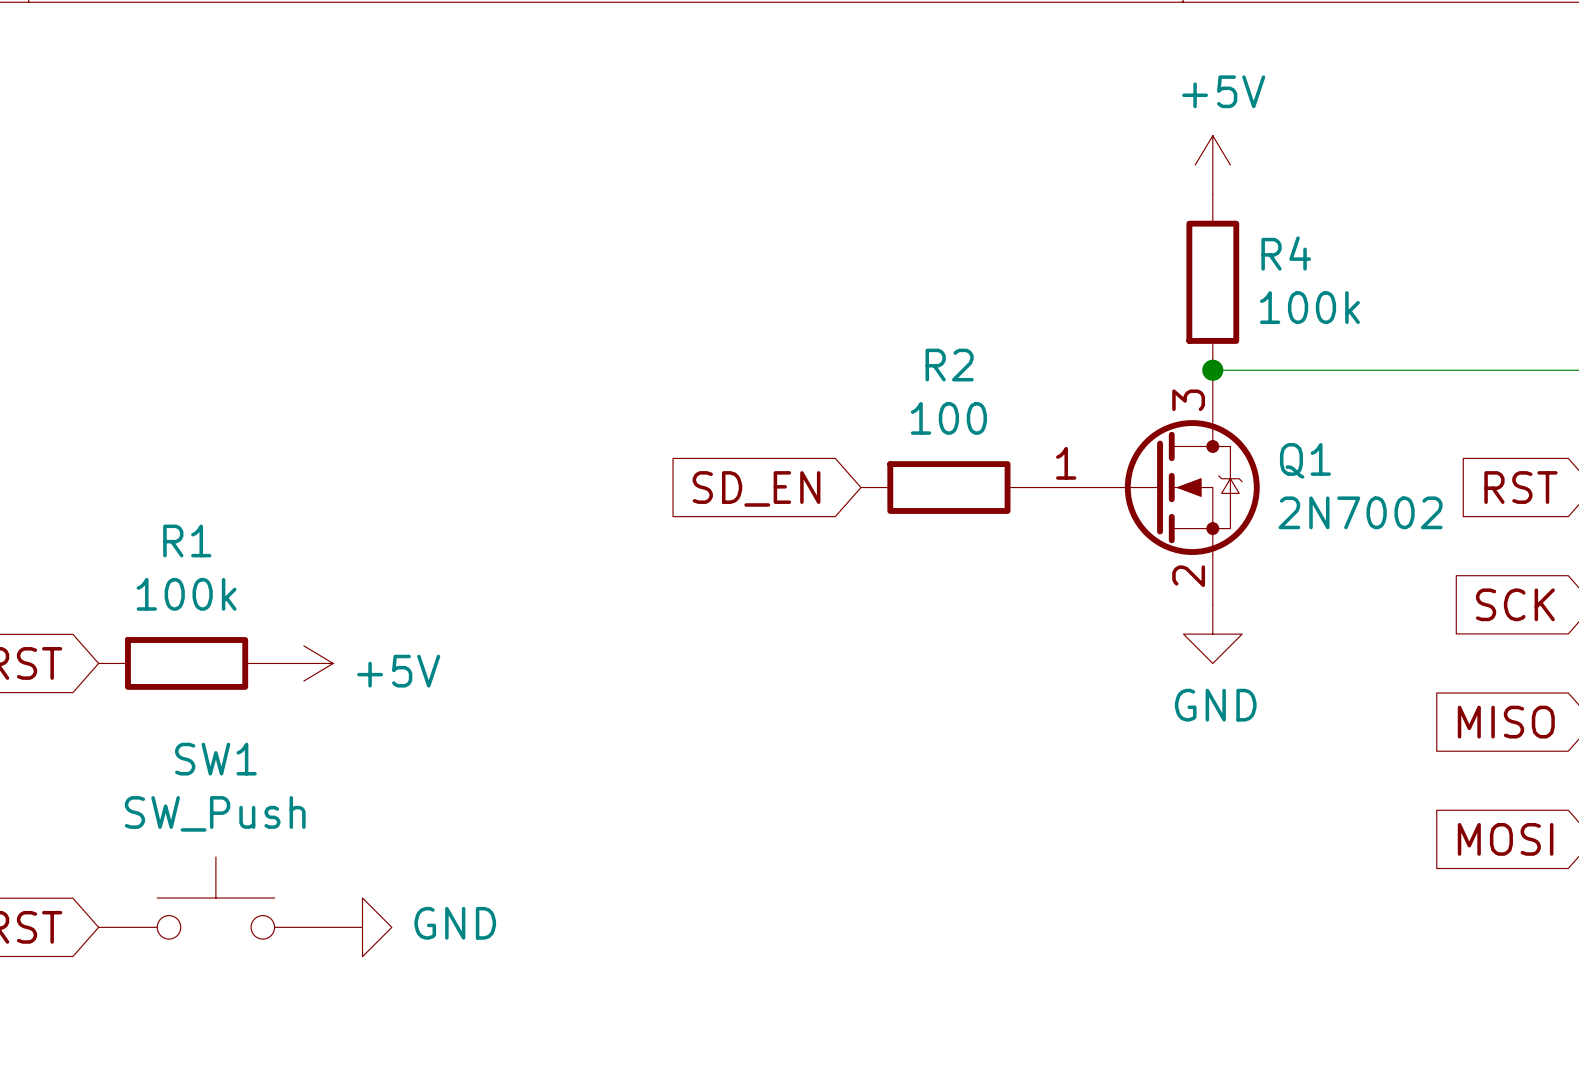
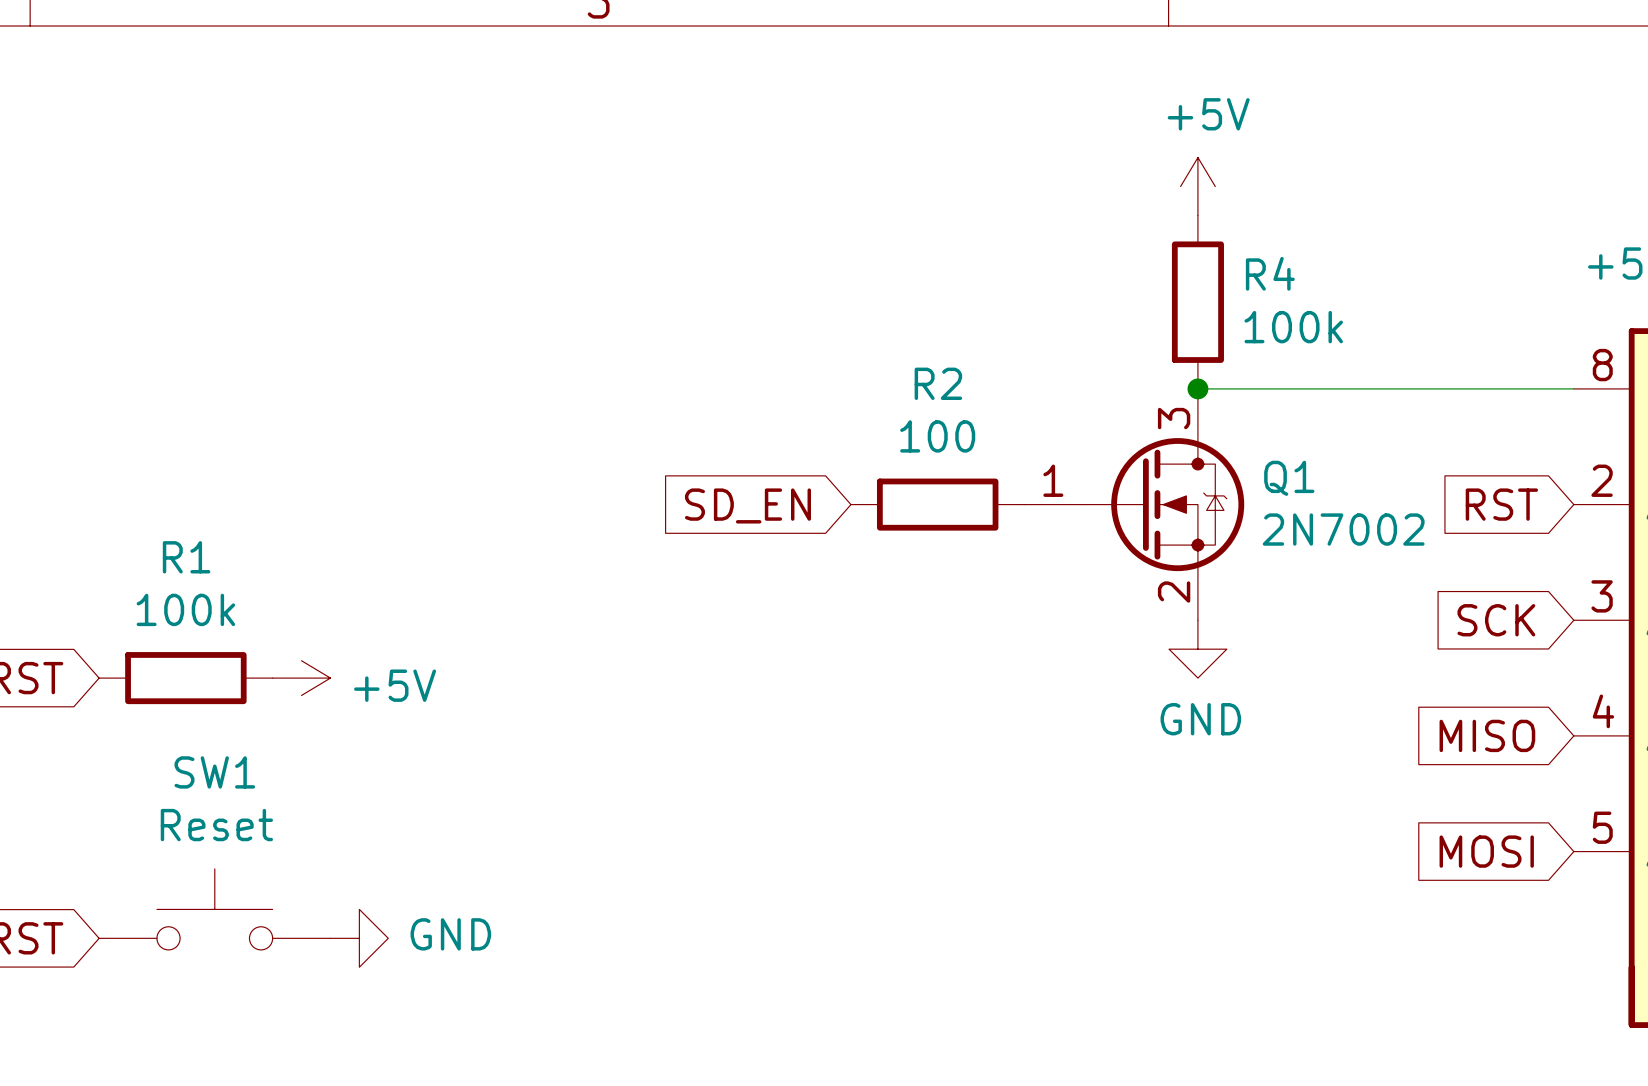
SW1 value: SW_Push (215, 813) -> Reset (216, 825)

